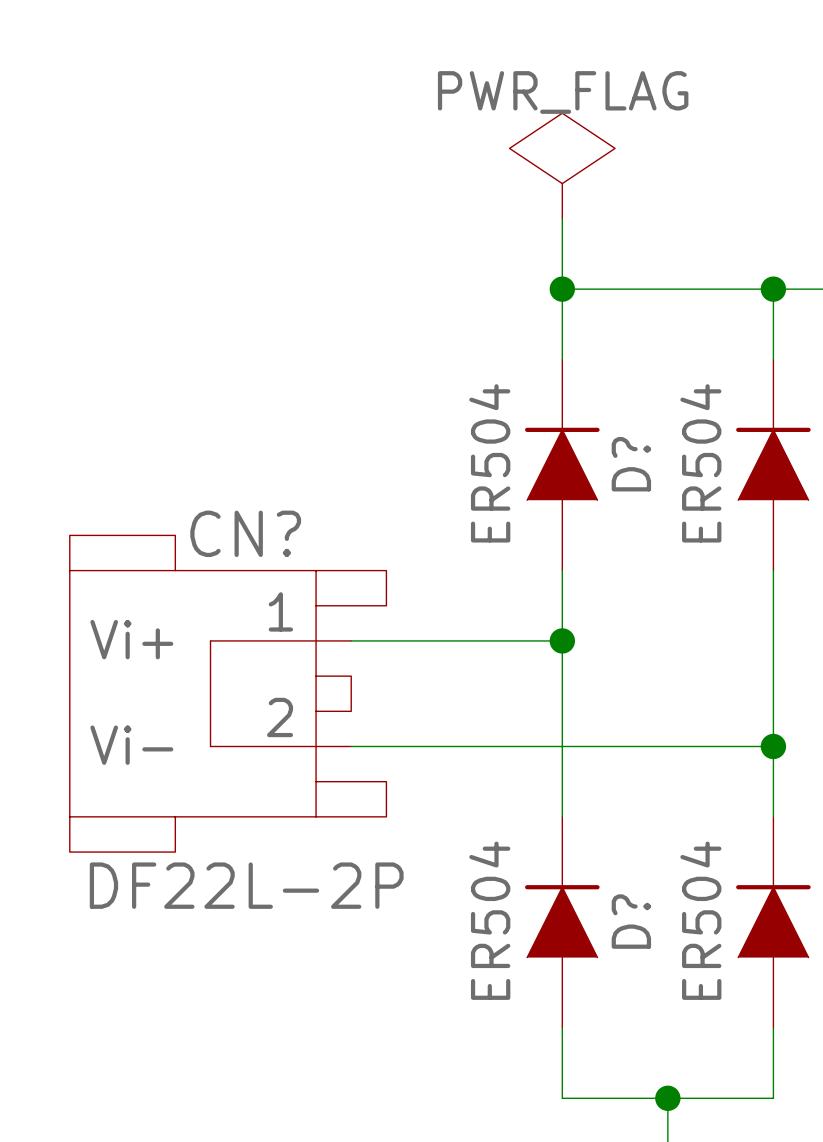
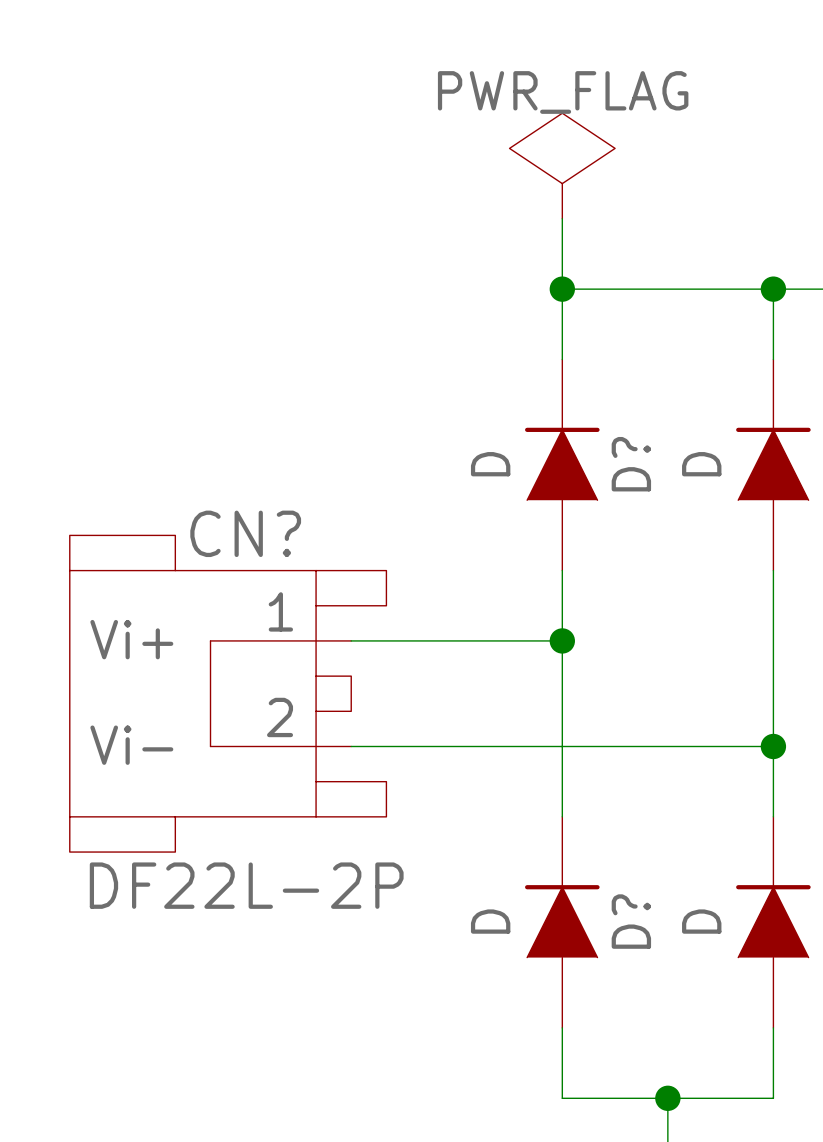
D? value: ER504 (489, 463) -> D (490, 464)
part value: ER504 (700, 463) -> D (701, 464)
D? value: ER504 (489, 920) -> D (490, 921)
part value: ER504 (700, 920) -> D (701, 921)

